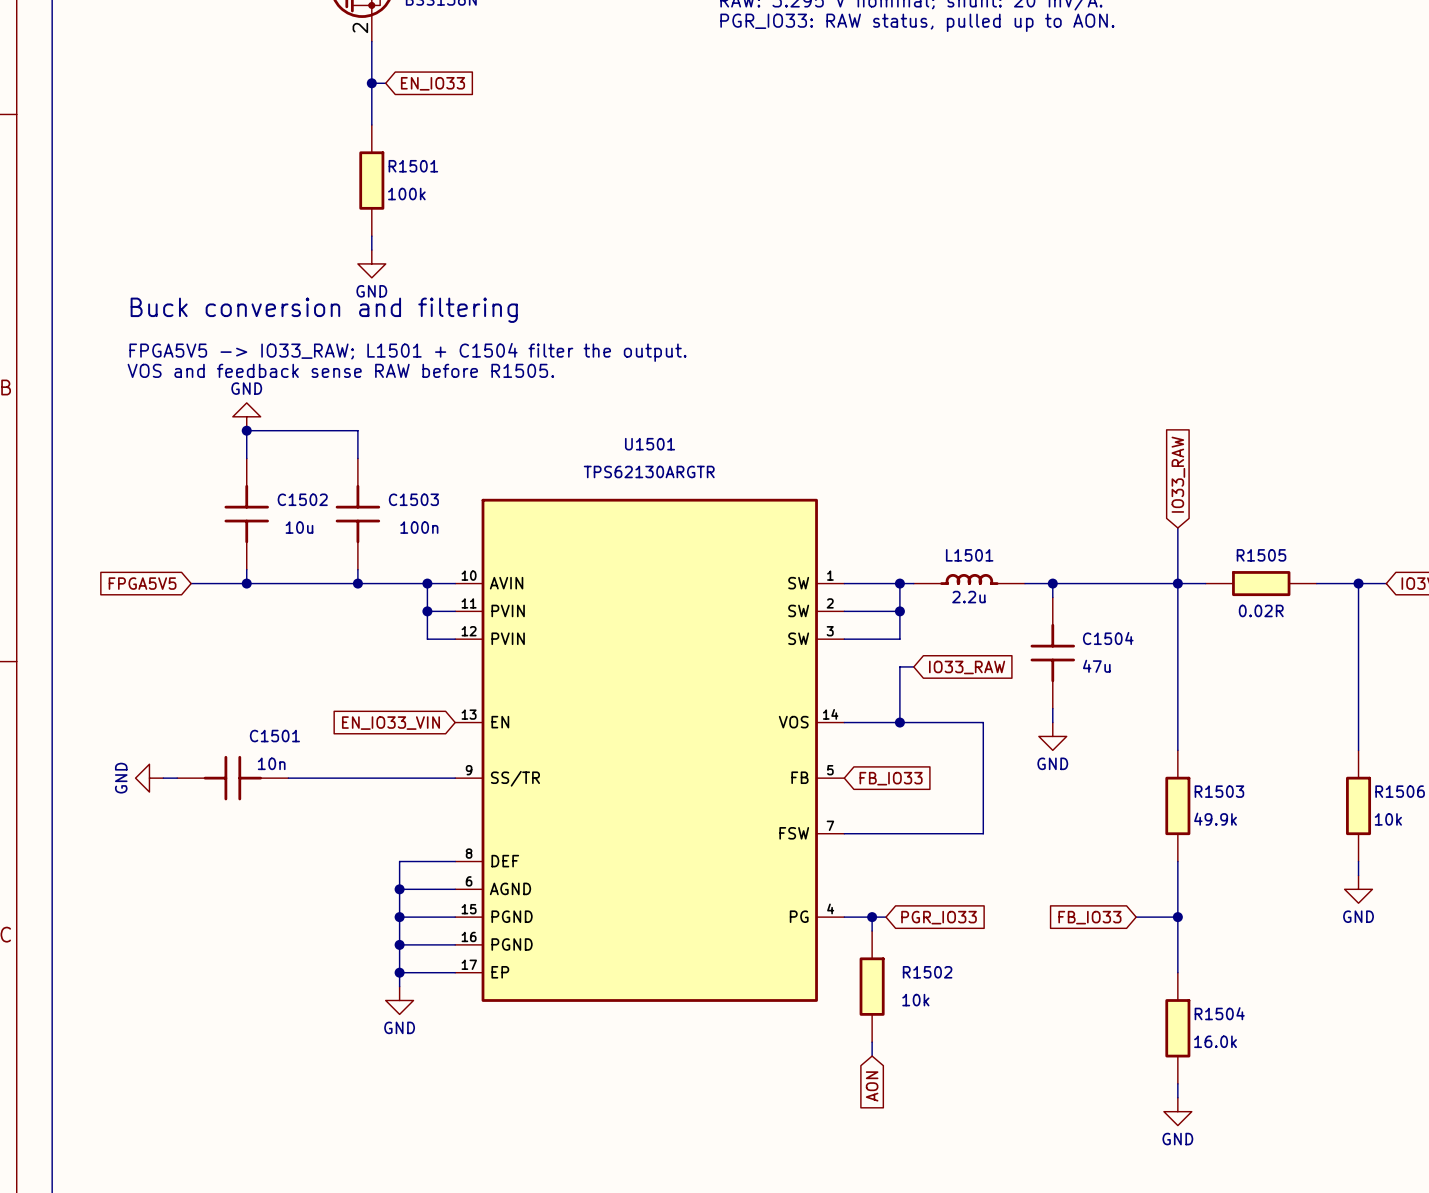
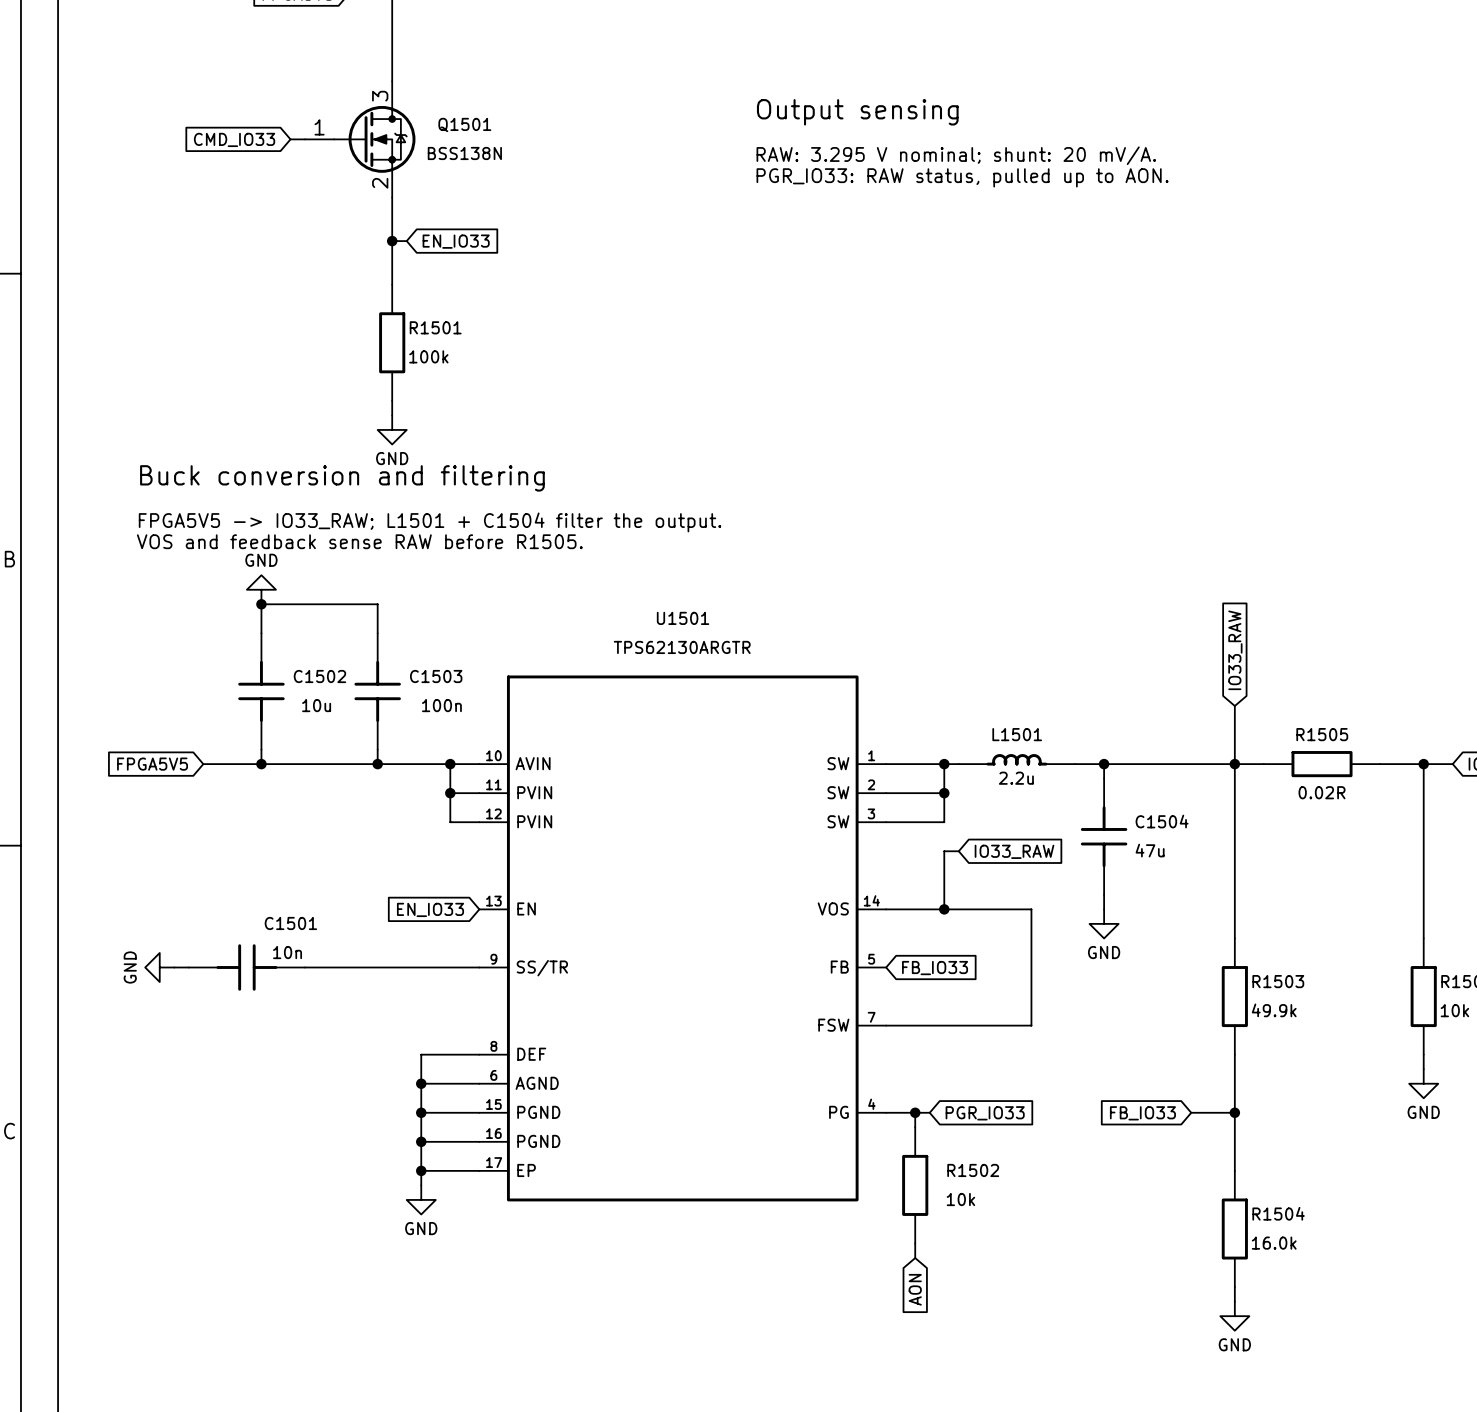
global label: EN_IO33_VIN (390, 723) -> EN_IO33 (430, 909)

